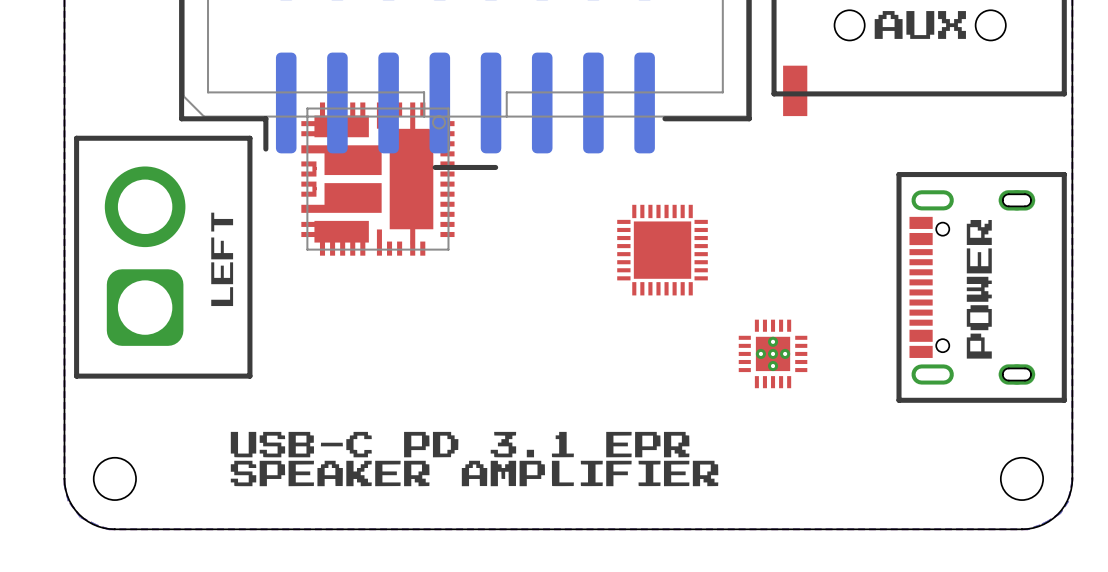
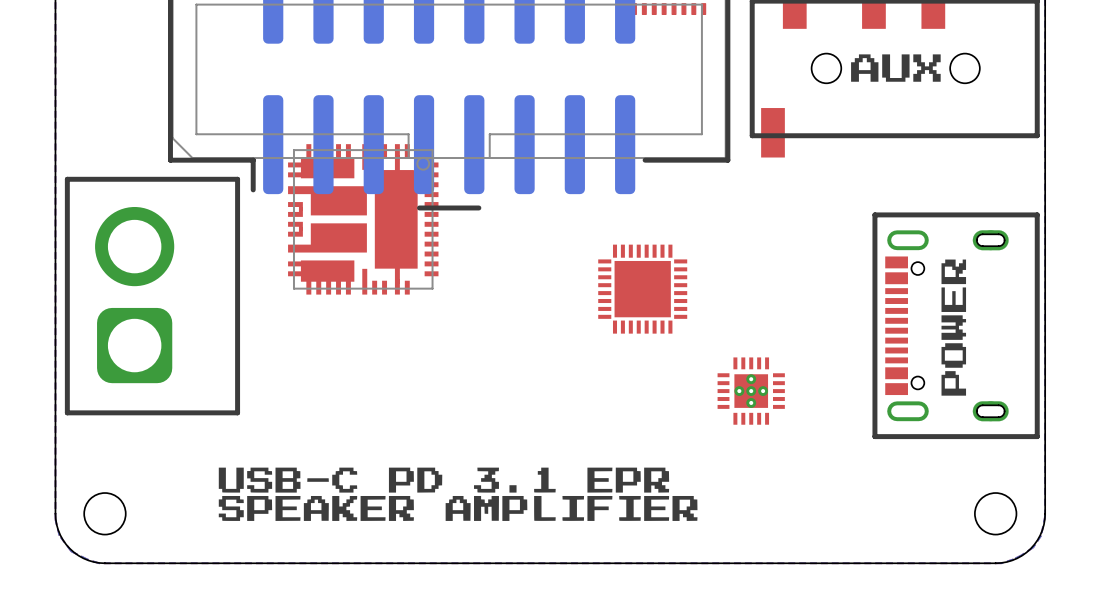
drawing: [211, 212, 234, 307] -> none

